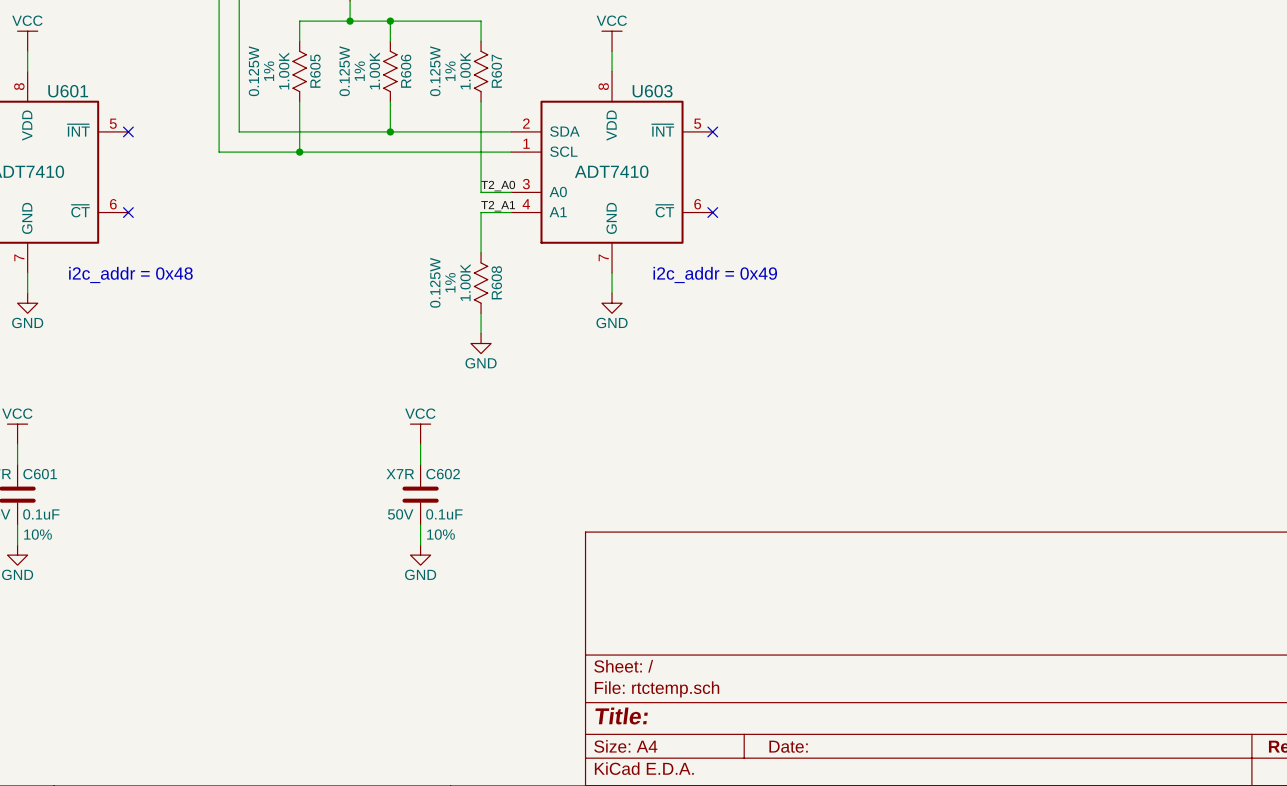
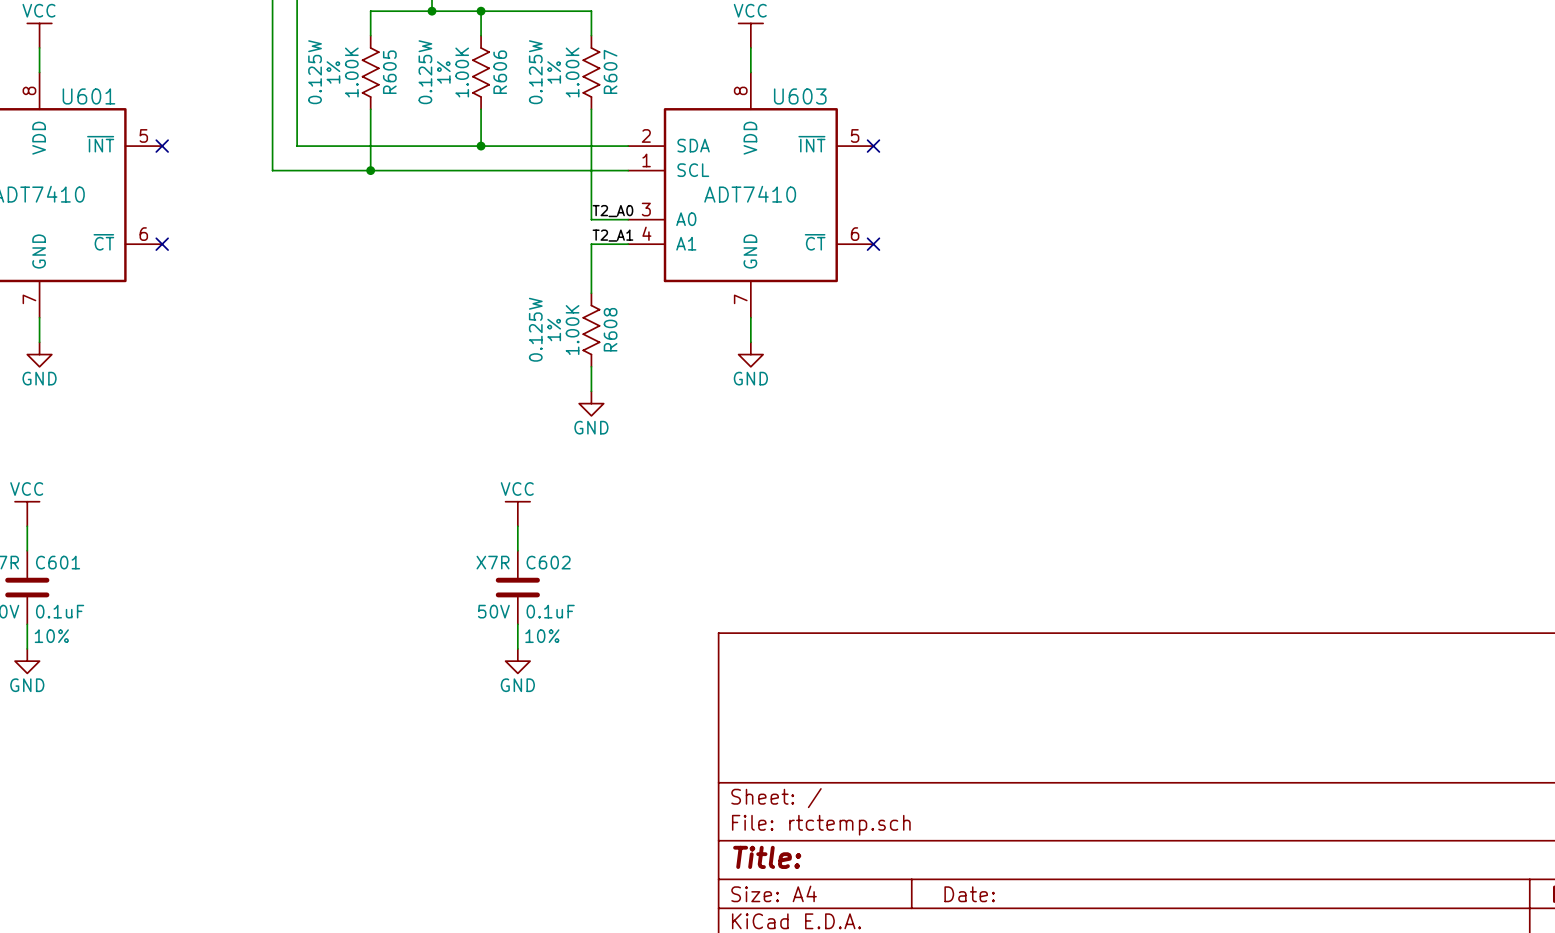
text: i2c_addr = 0x48 (130, 274) -> none
text: i2c_addr = 0x49 (715, 274) -> none

